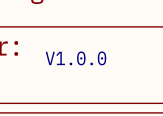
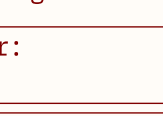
text: V1.0.0 (75, 58) -> none

